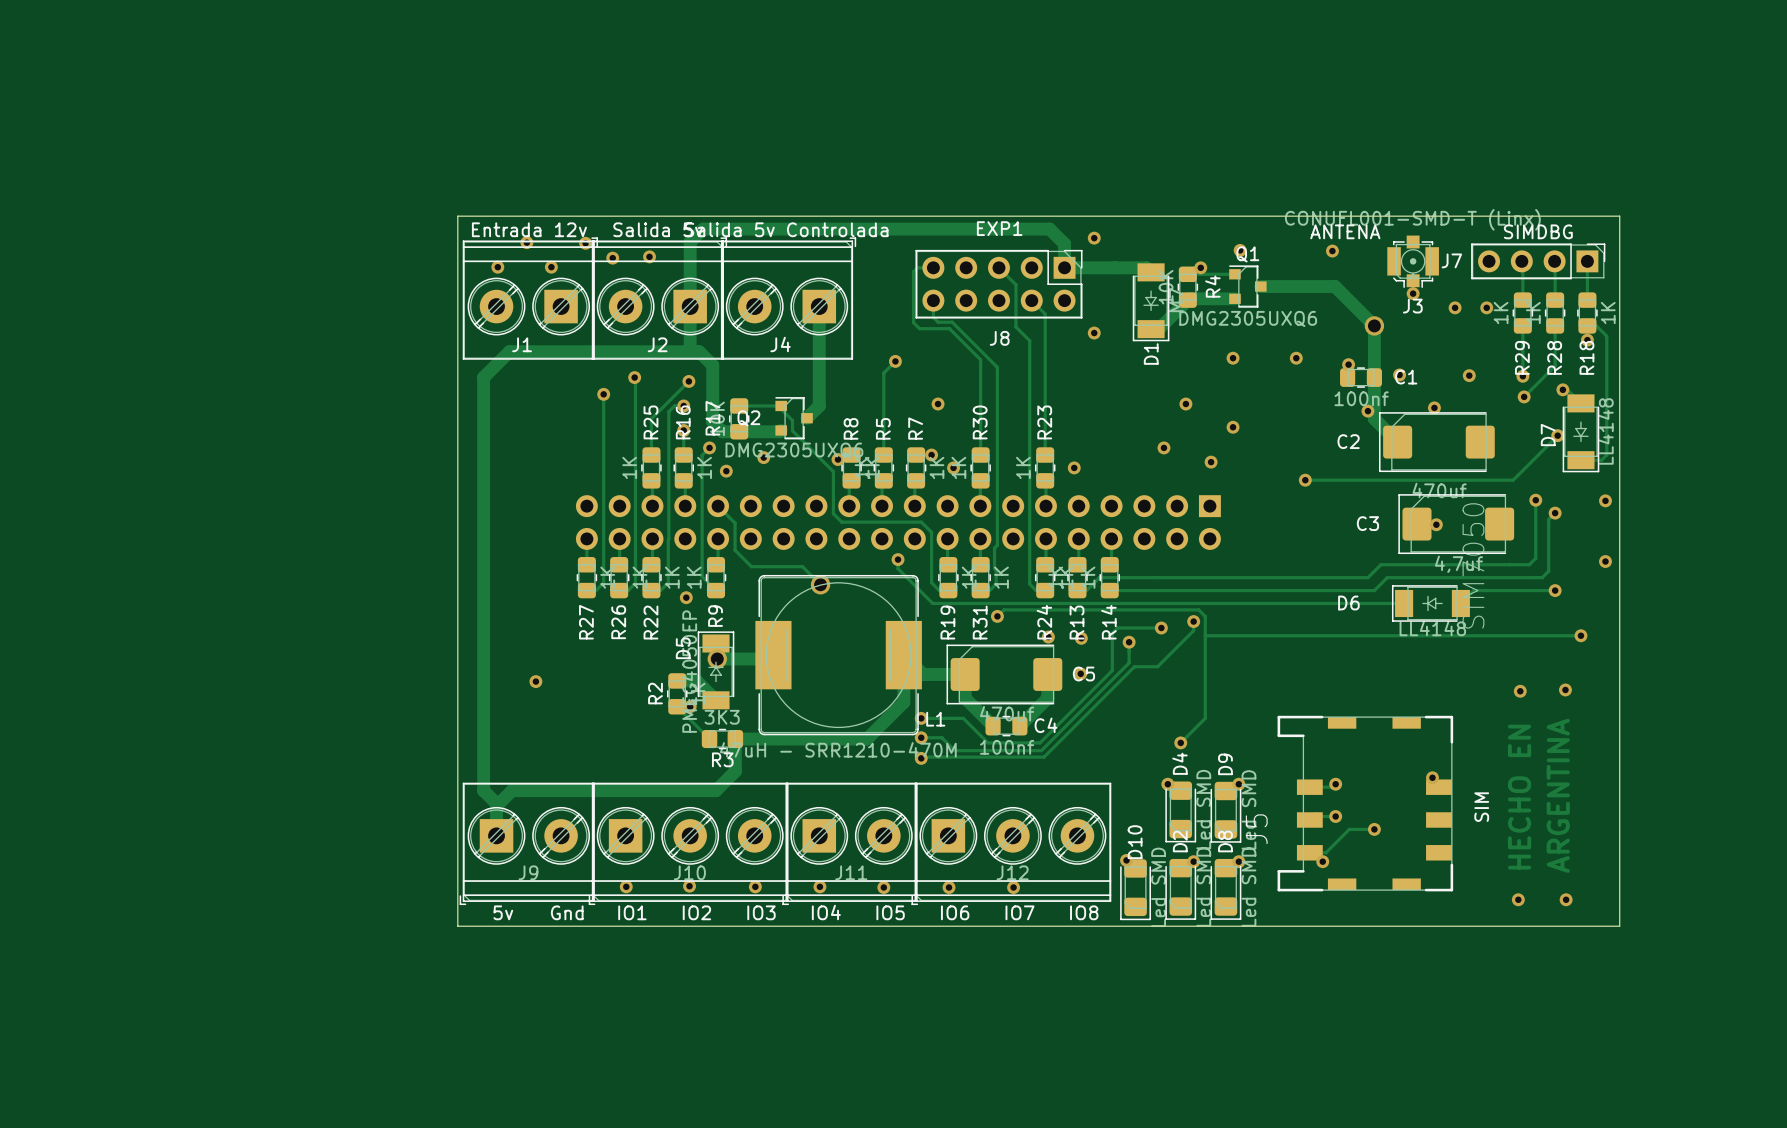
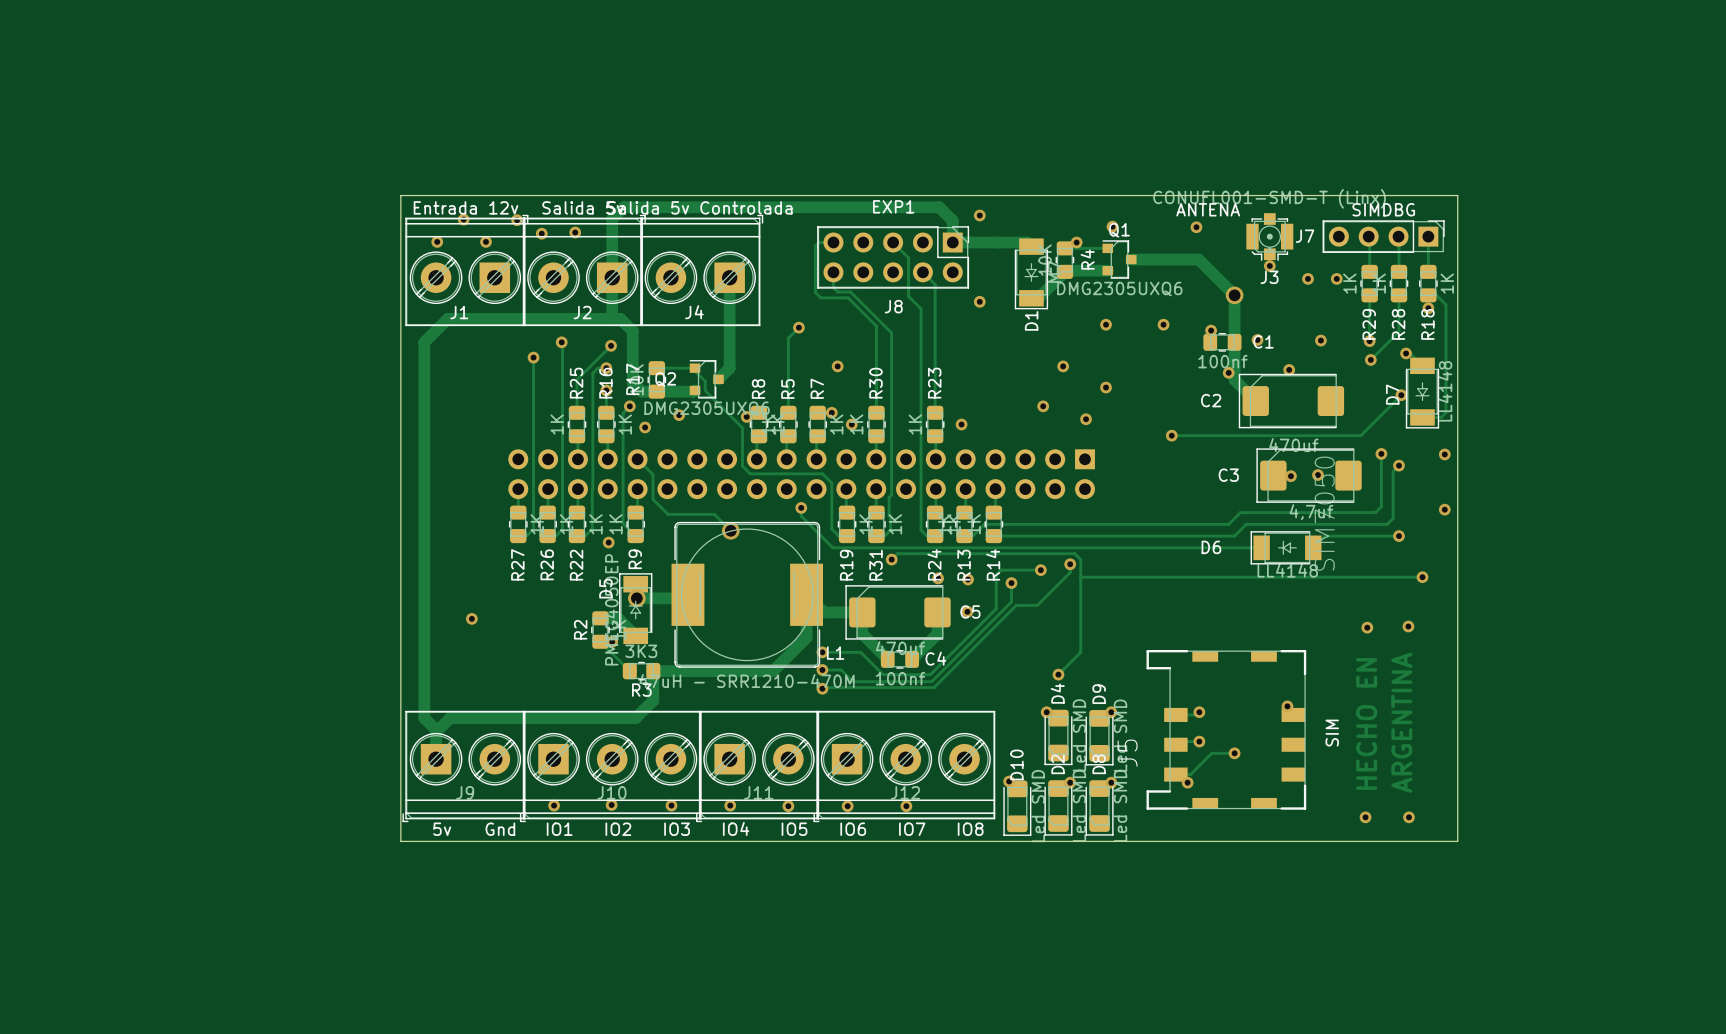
via: none -> (1317, 475)

